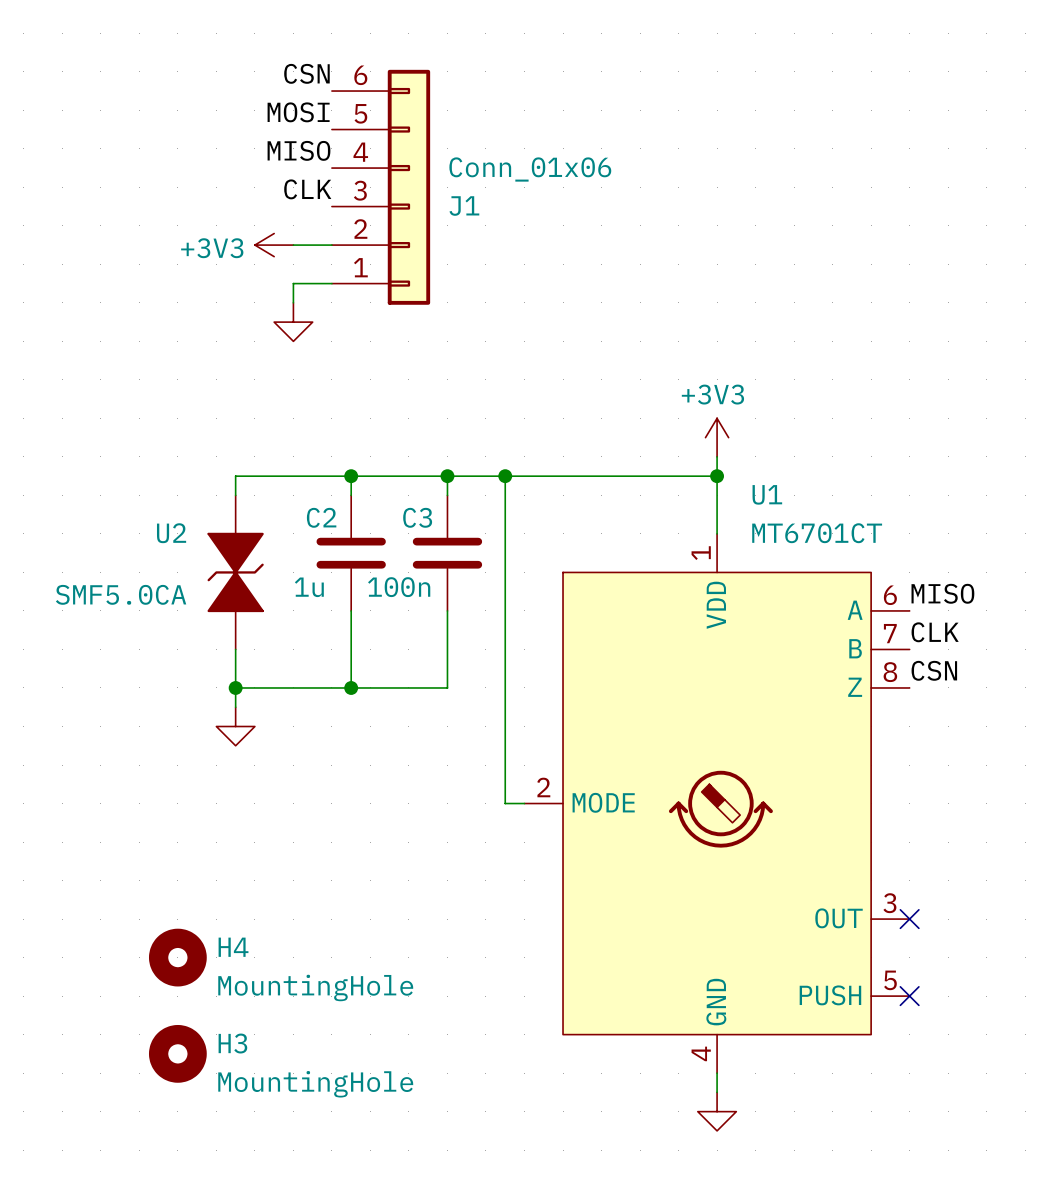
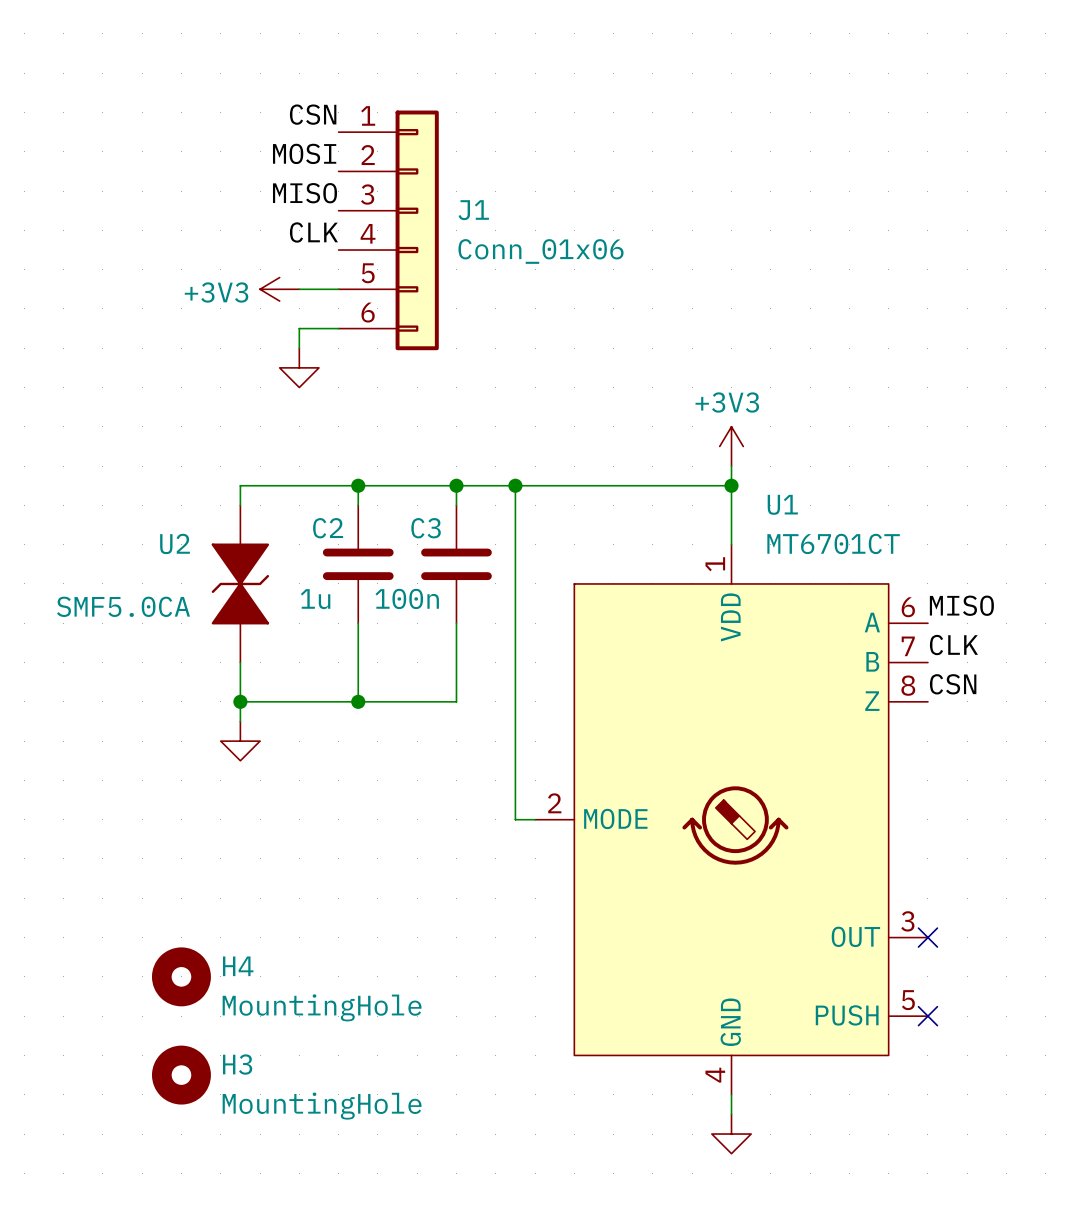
label: CSN (306, 73) -> none
label: MOSI (298, 112) -> CSN (313, 114)
label: MISO (298, 150) -> MOSI (304, 153)
J1 flip: as is (408, 187) -> up-down (417, 230)
label: CLK (307, 189) -> MISO (305, 193)
label: none -> CLK (313, 232)
power symbol position: +3V3 (274, 245) -> +3V3 (279, 289)
wire: (293, 245) (331, 245) -> none
wire: (293, 283) (293, 302) -> none
power symbol position: (293, 322) -> (299, 367)
wire: none -> (338, 328) (299, 328) (299, 348)

